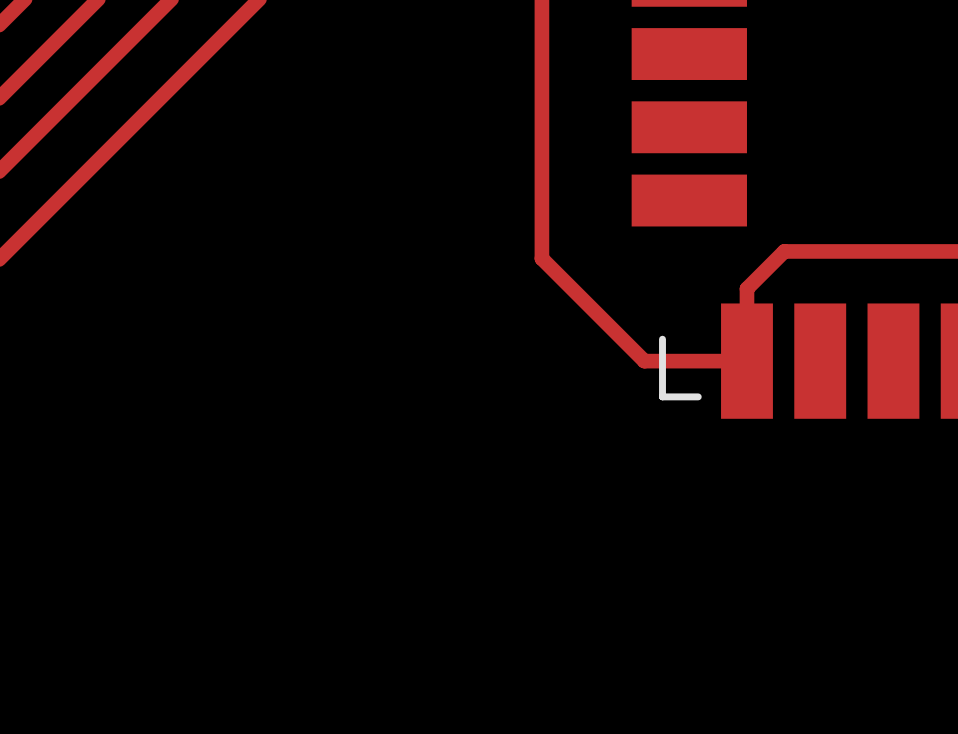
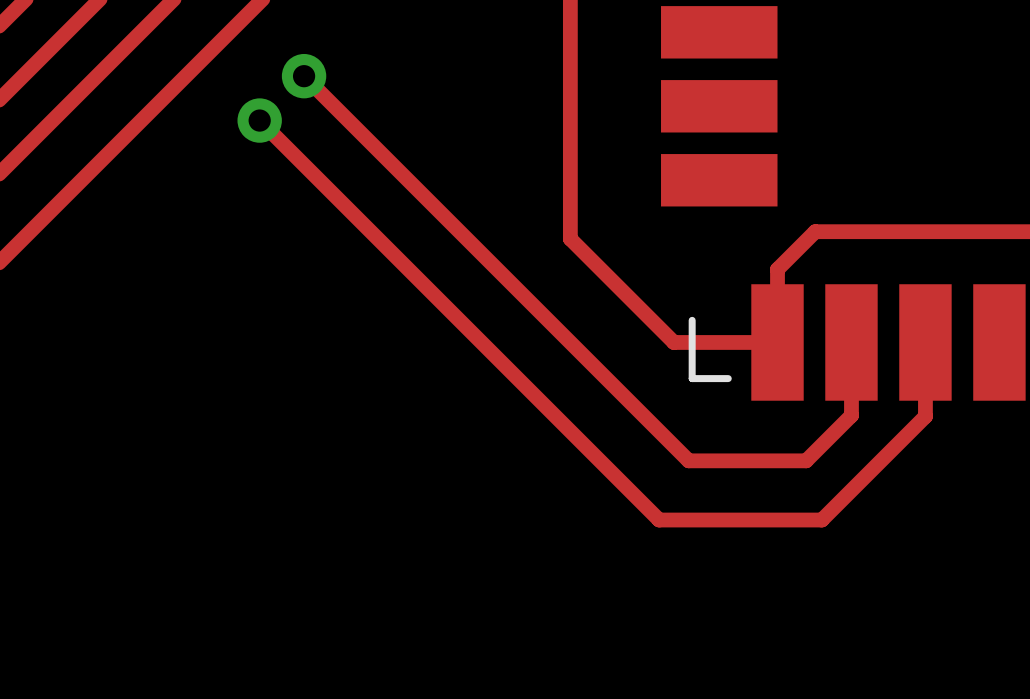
track: none -> (304, 76) (688, 460) (806, 460) (851, 415) (851, 342)
via: none -> (304, 76)
track: none -> (259, 120) (659, 520) (821, 520) (925, 416) (925, 342)
via: none -> (259, 120)

